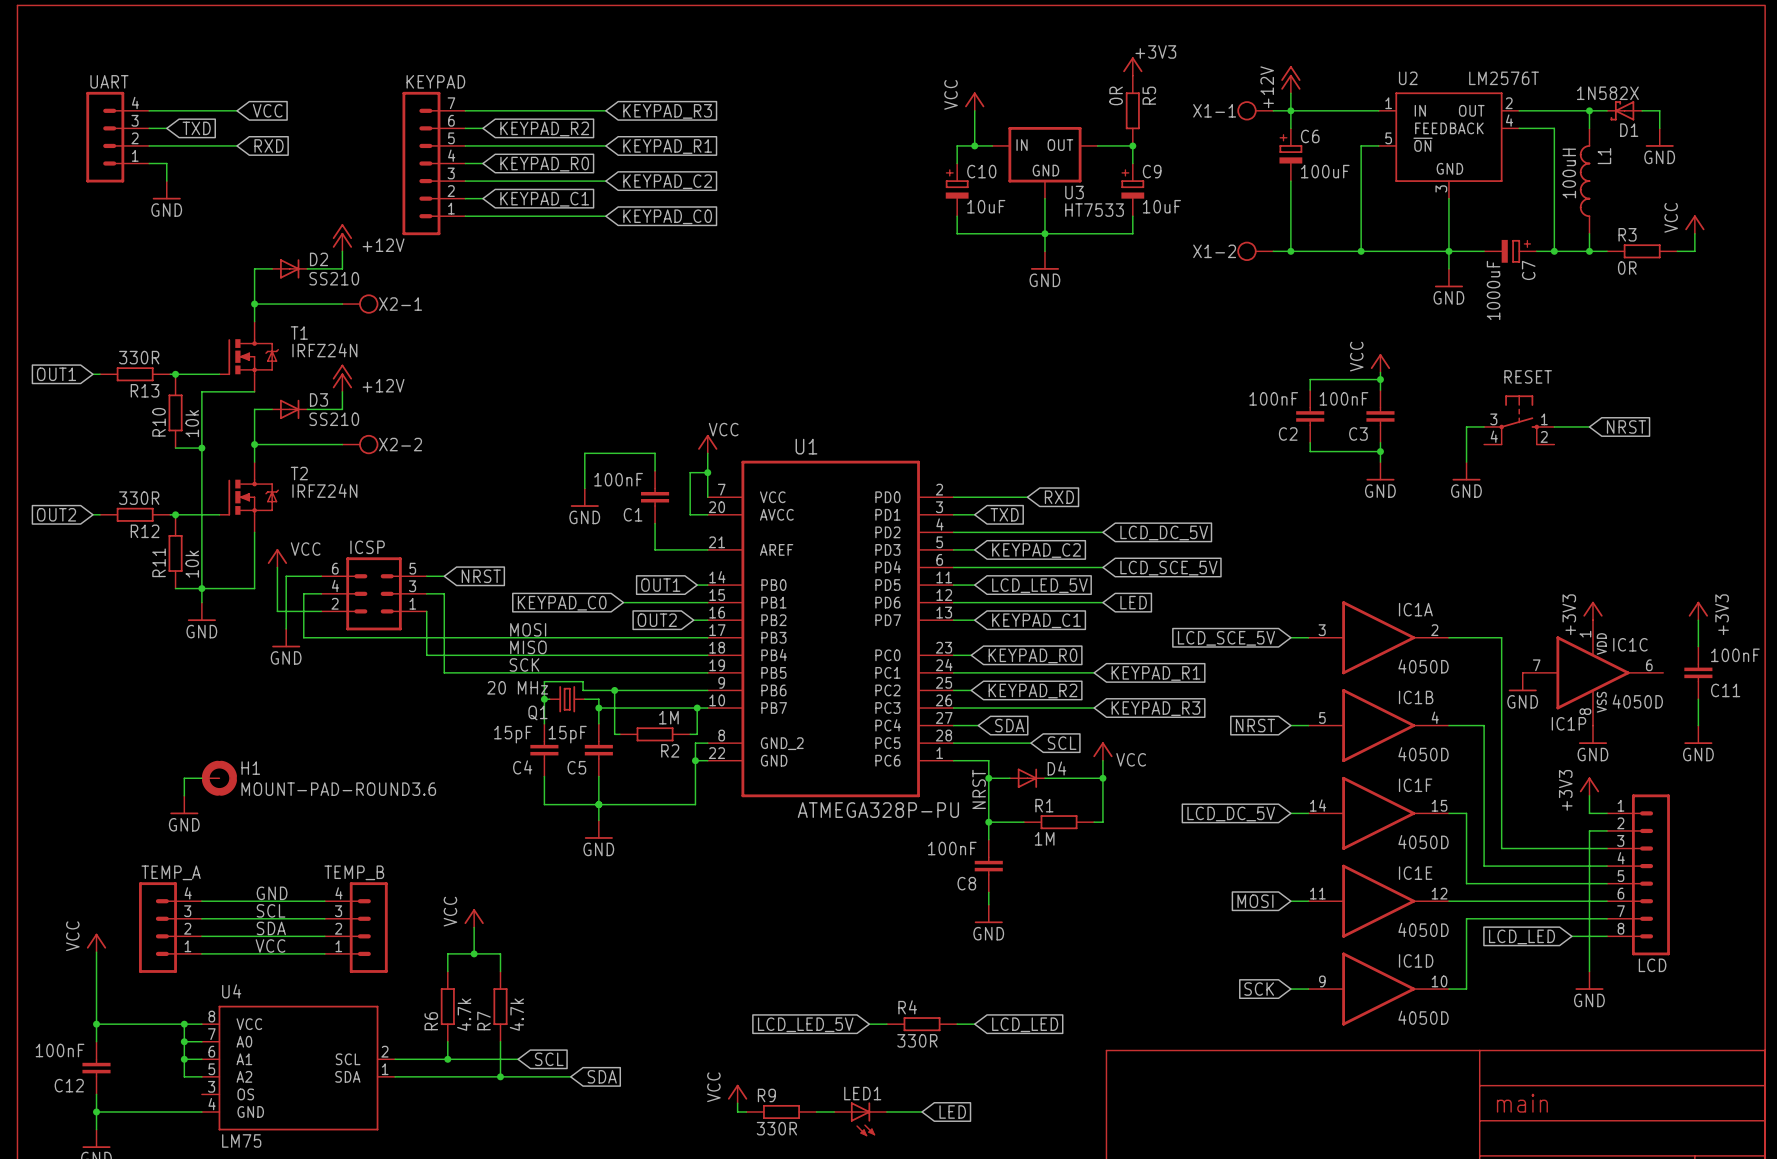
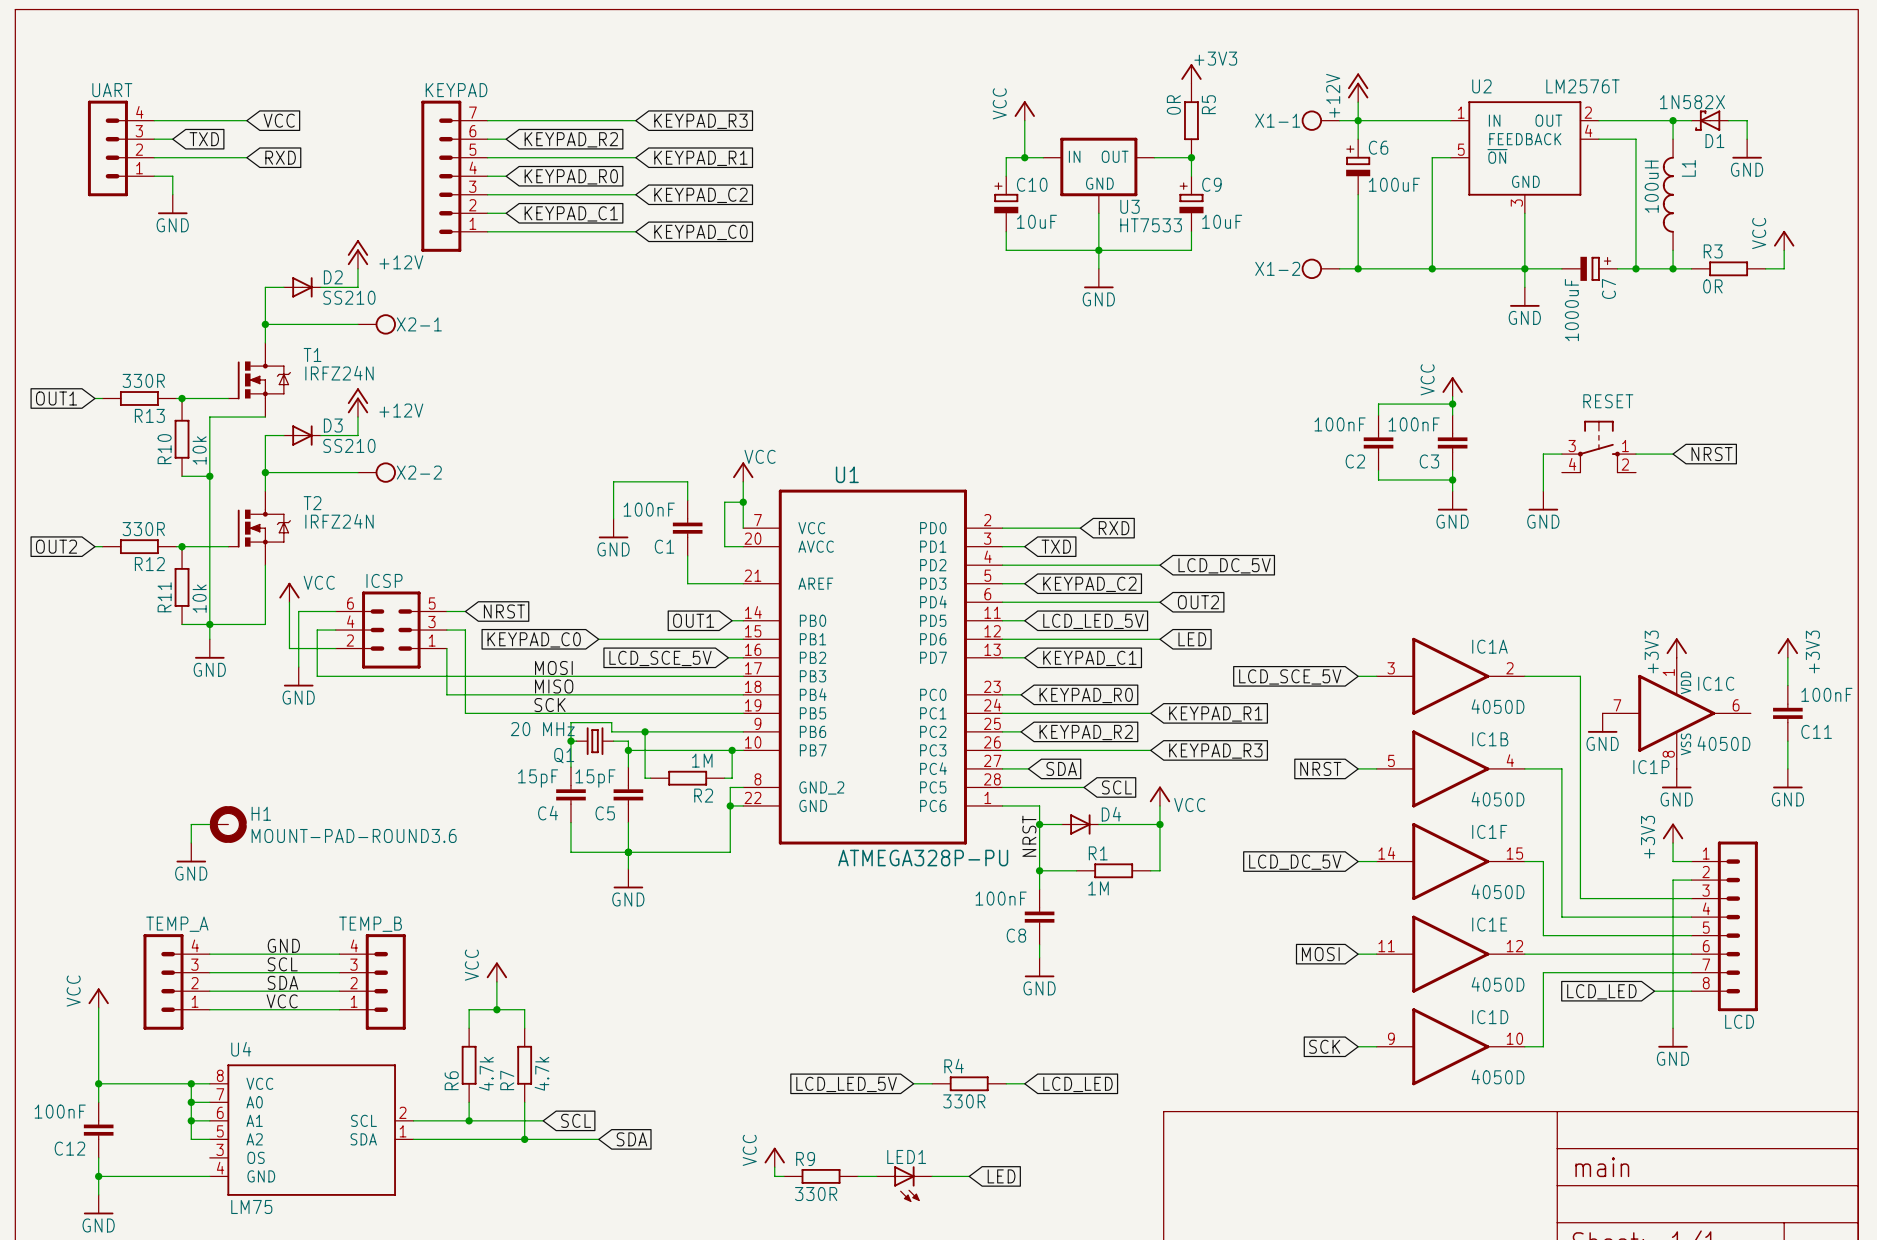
global label: LCD_SCE_5V (1168, 568) -> OUT2 (1198, 602)
wire: none -> (598, 639) (654, 639)
global label position: KEYPAD_C0 (562, 603) -> KEYPAD_C0 (534, 639)
global label: OUT2 (657, 620) -> LCD_SCE_5V (660, 658)

